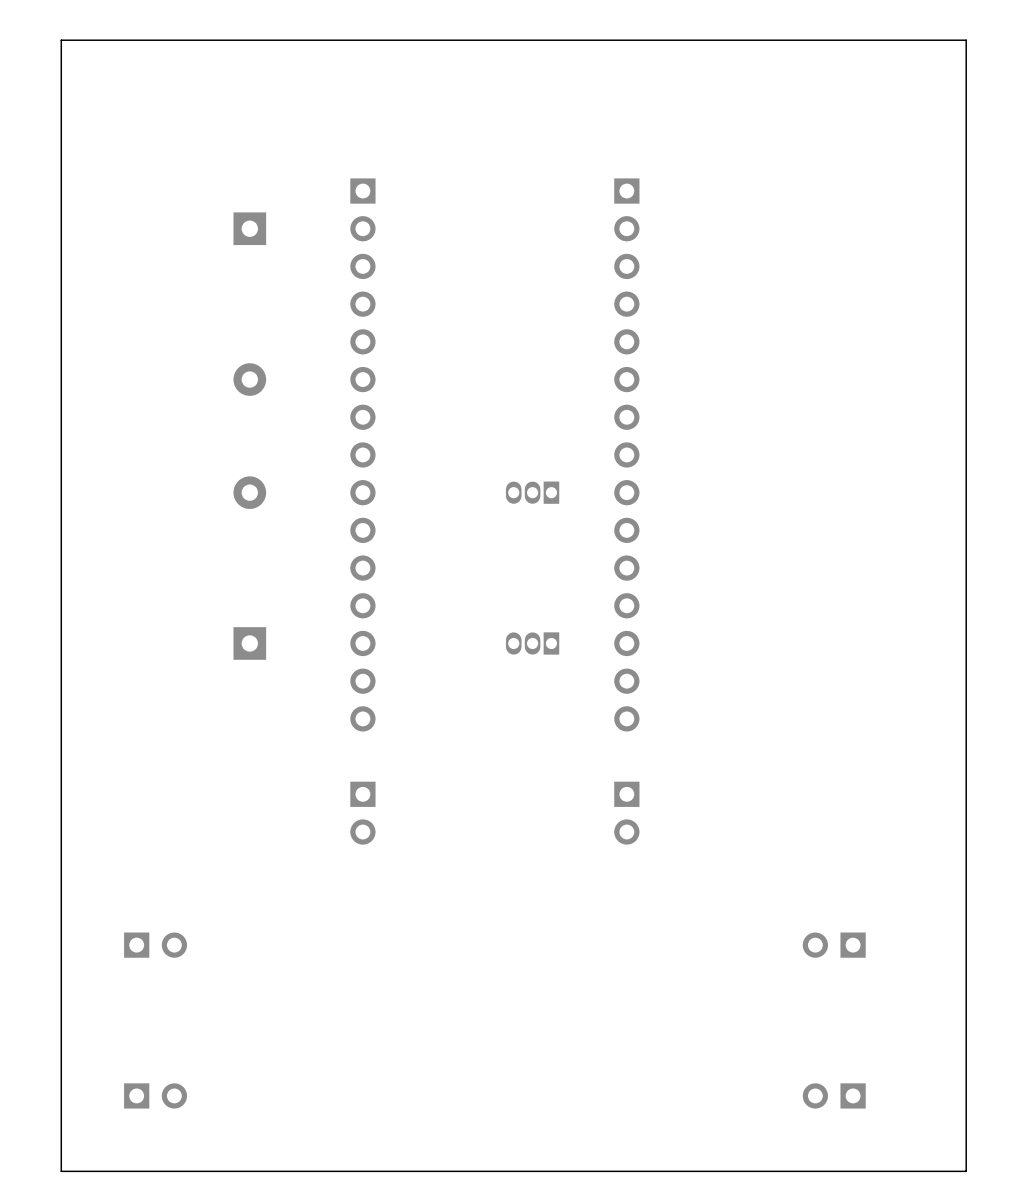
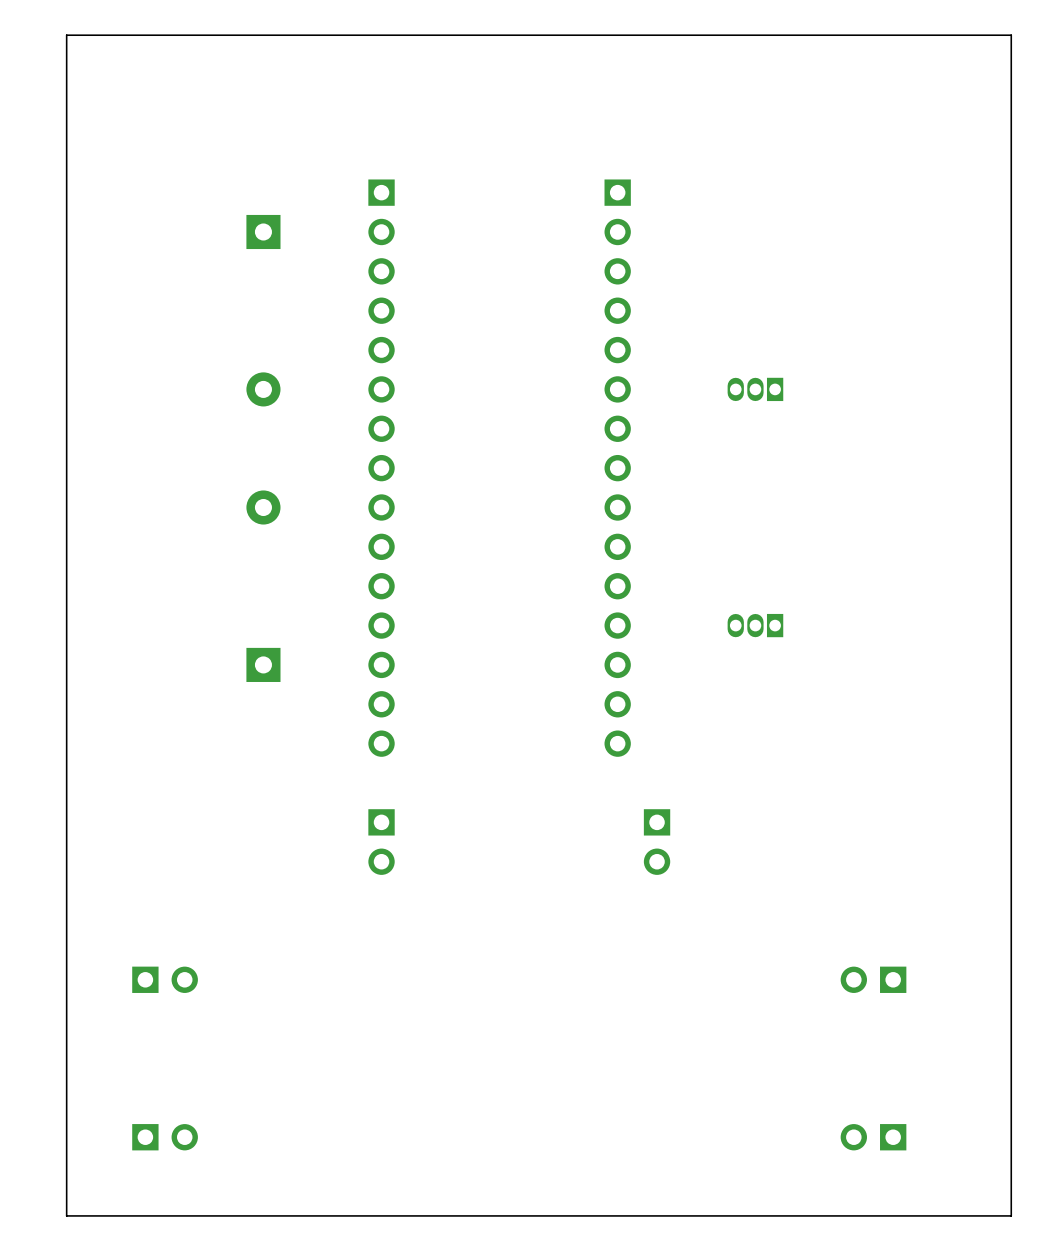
part: none -> (755, 389)
part position: (626, 454) -> (617, 468)
part: (532, 492) -> none
part: none -> (755, 625)
part: (532, 643) -> none

